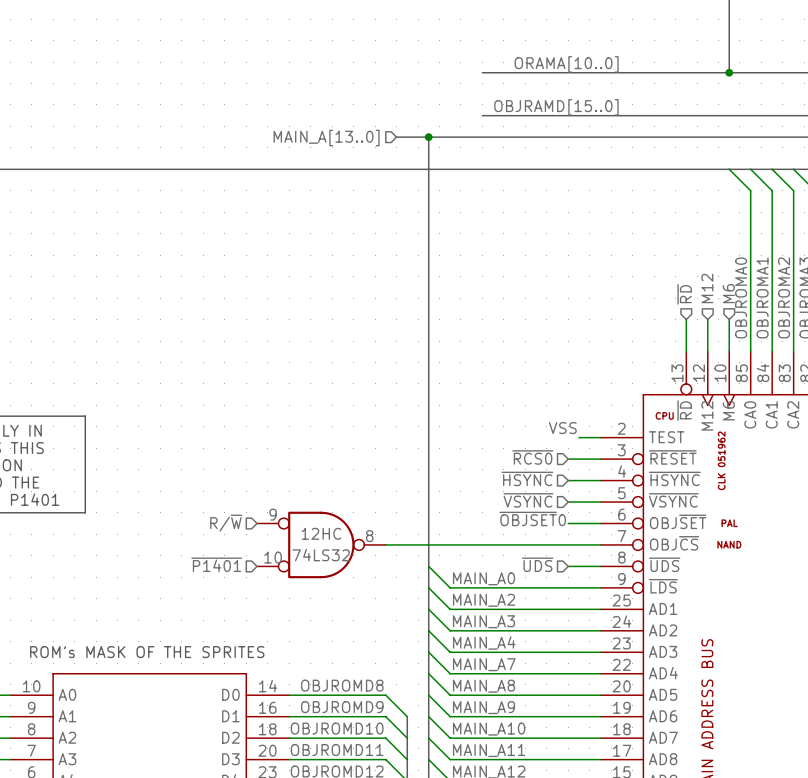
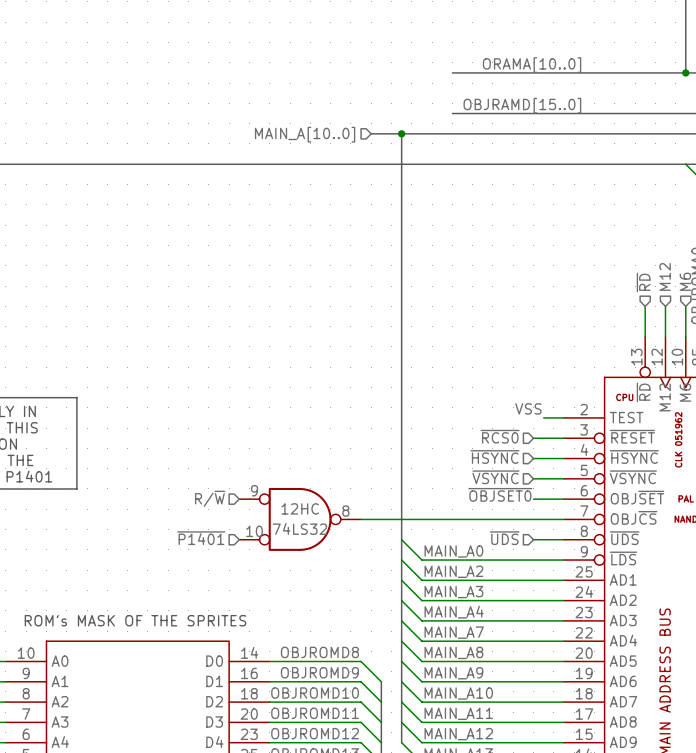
hierarchical label: MAIN_A[13..0] (326, 138) -> MAIN_A[10..0] (305, 134)
label: ~{OBJSET}0 (532, 518) -> ~{OBJSET0} (500, 494)

